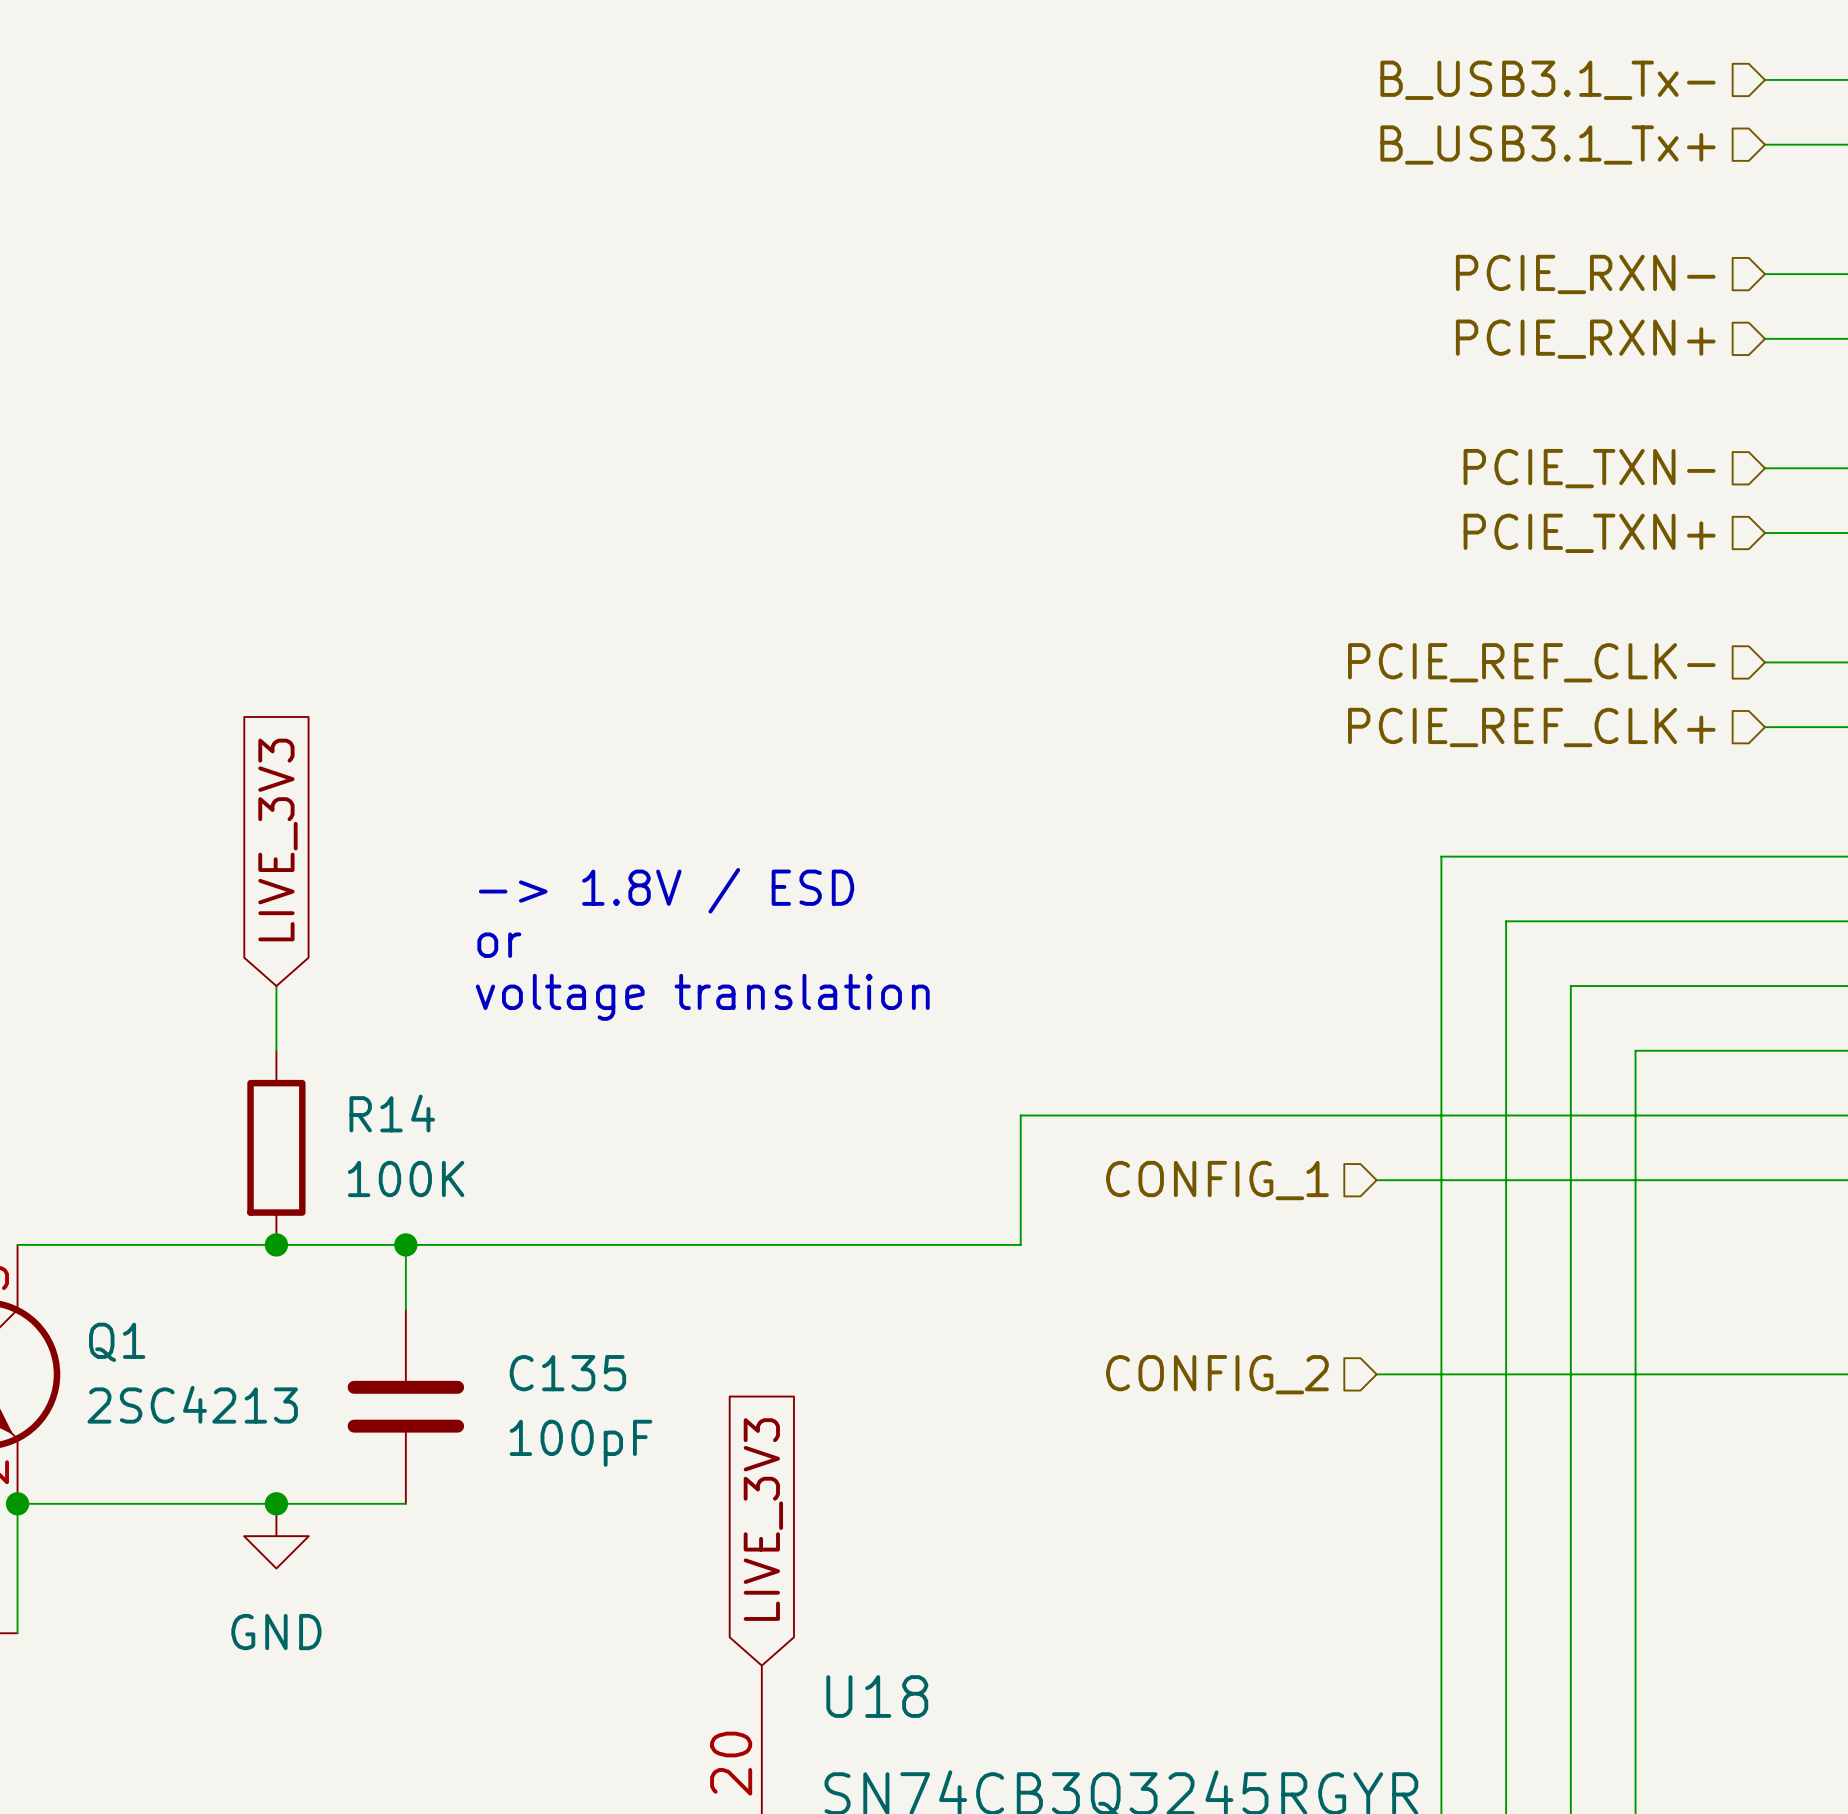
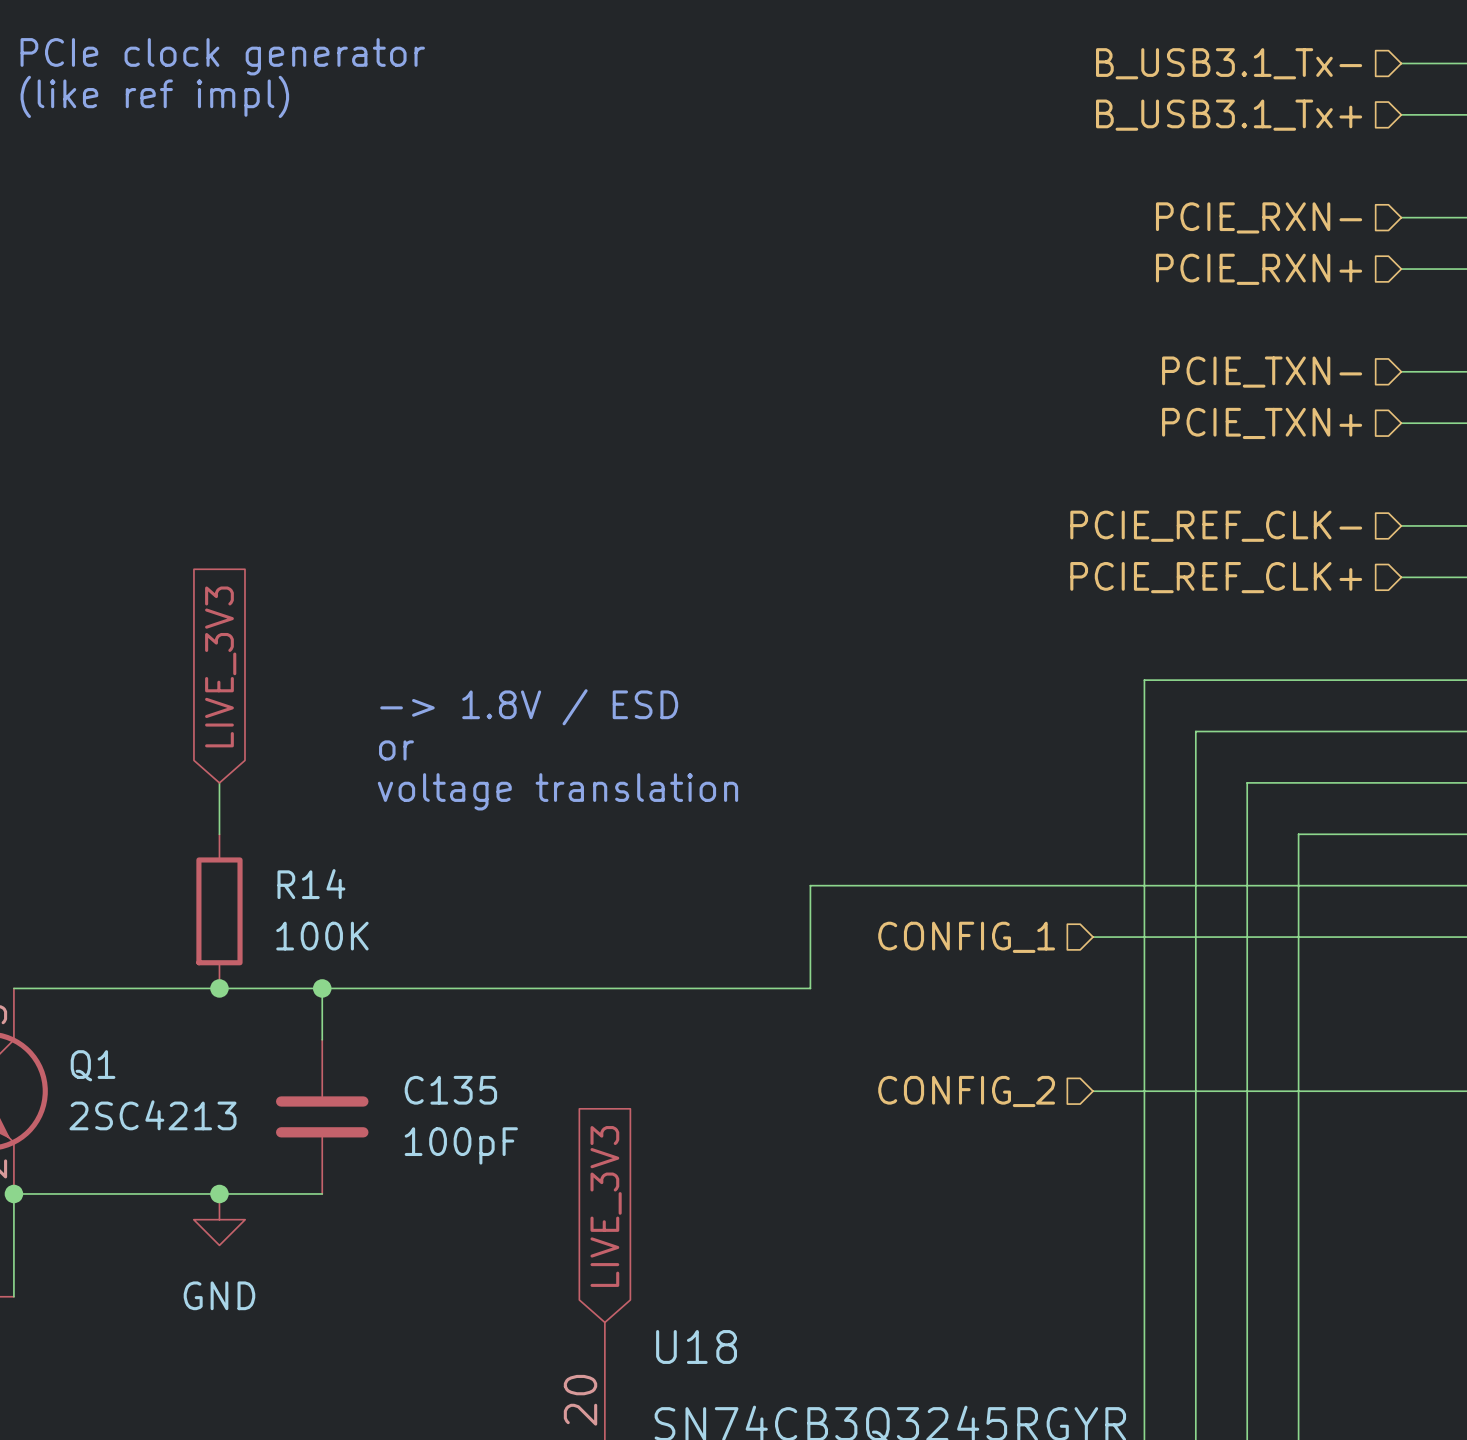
text: none -> PCIe clock generator (222, 56)
text: none -> (like ref impl) (154, 96)

